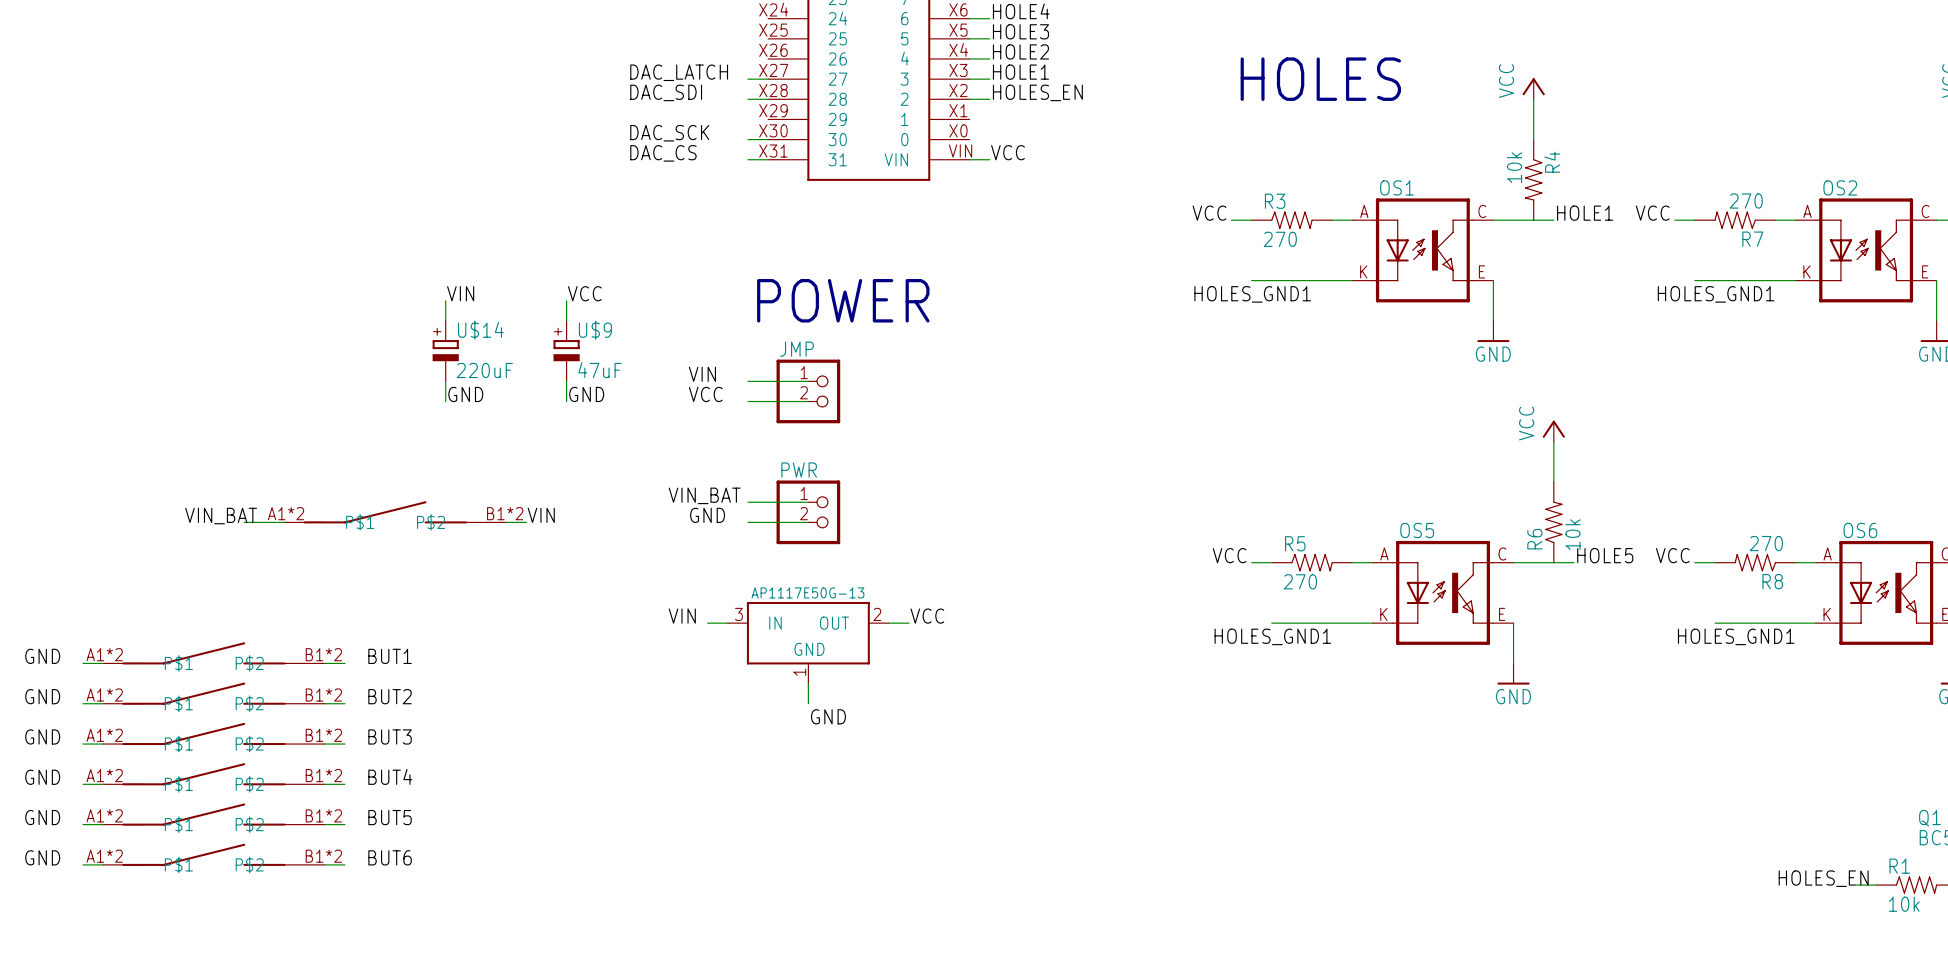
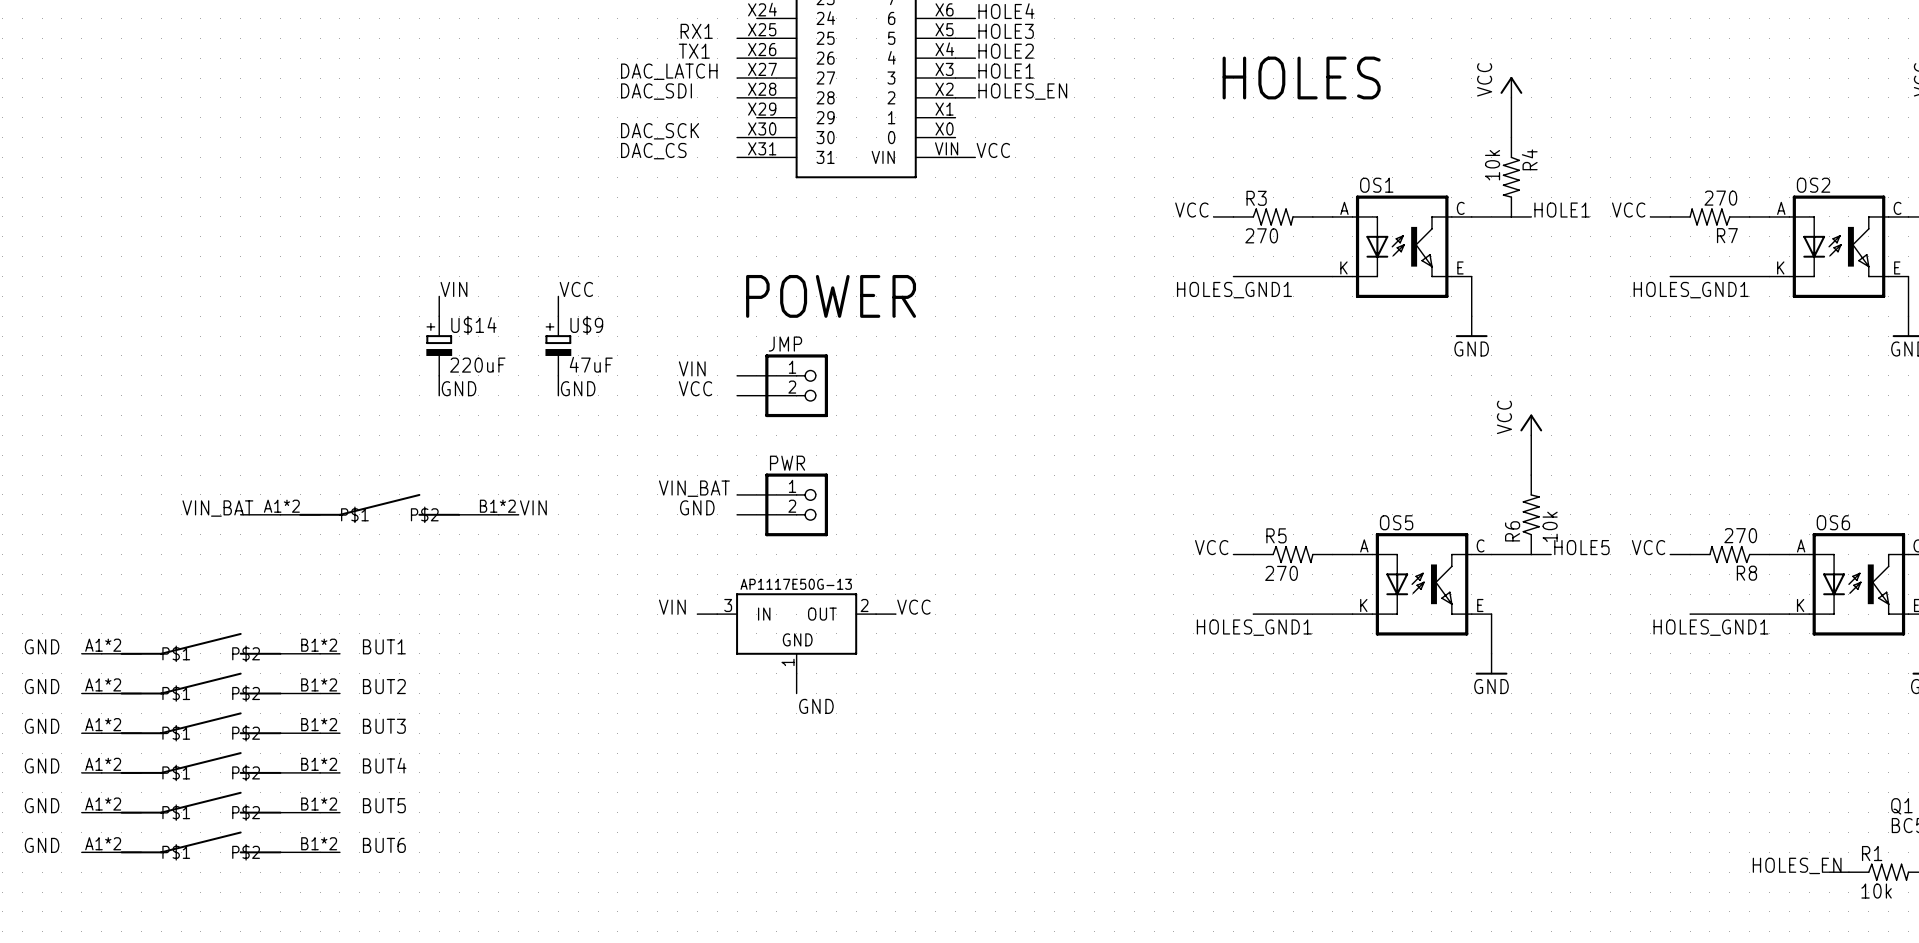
label: none -> RX1 (696, 31)
wire: none -> (737, 38) (756, 38)
label: none -> TX1 (694, 51)
wire: none -> (737, 58) (756, 58)

